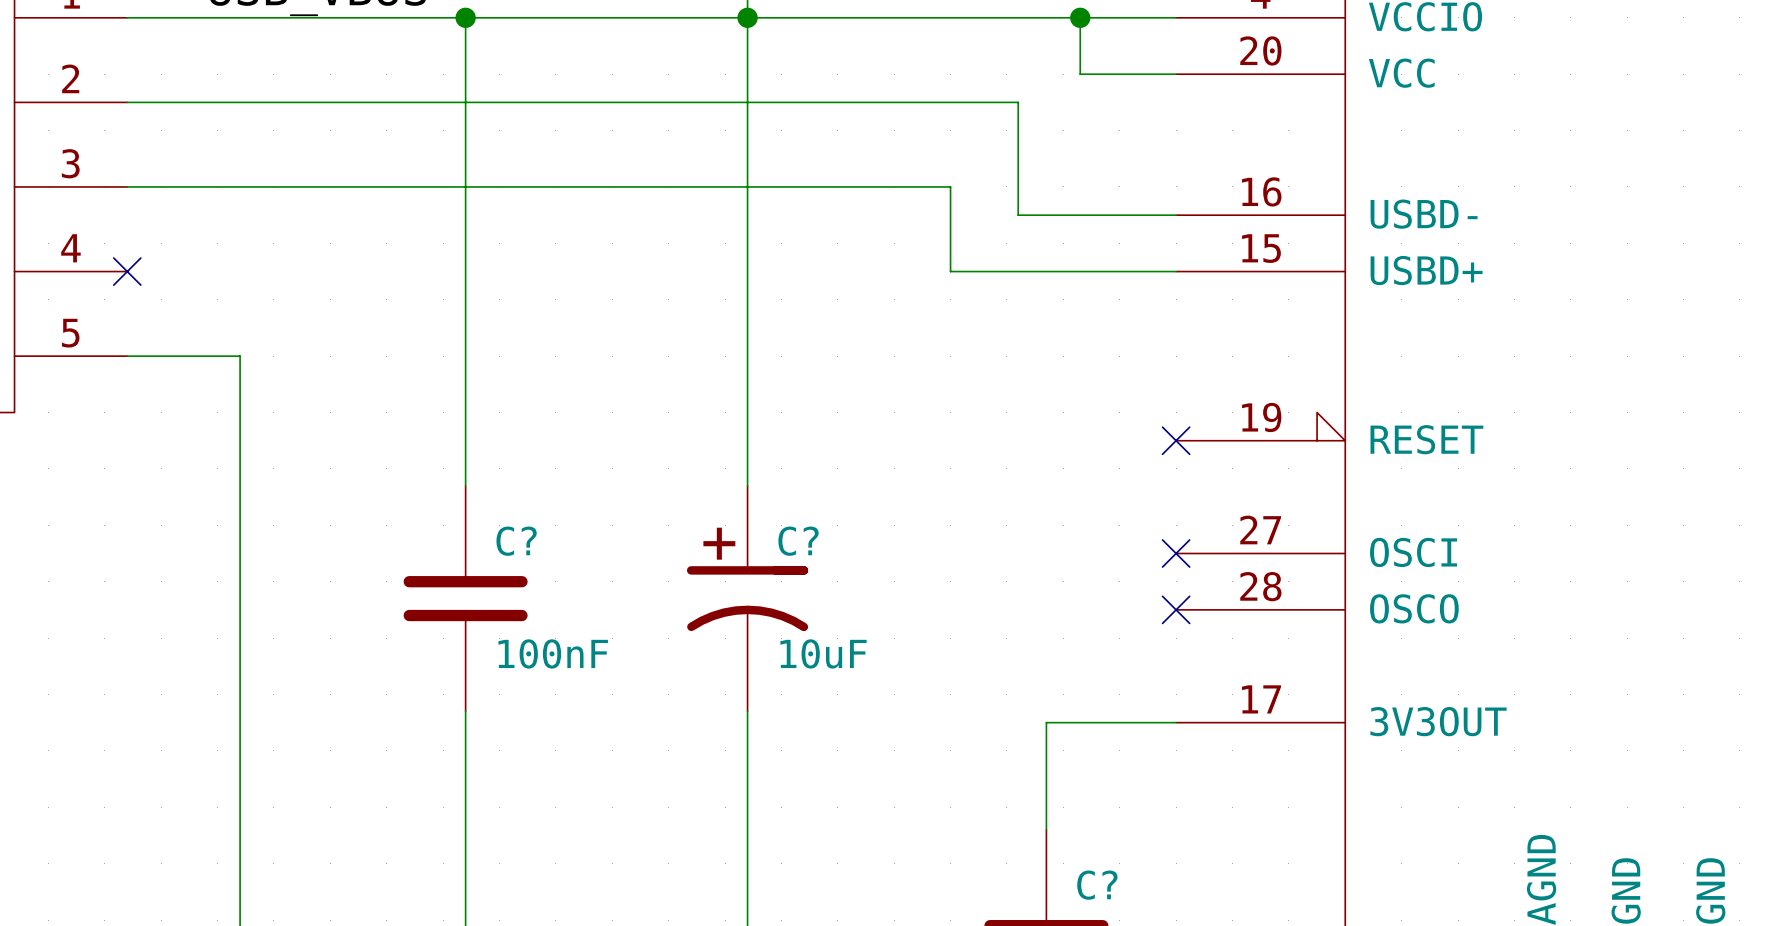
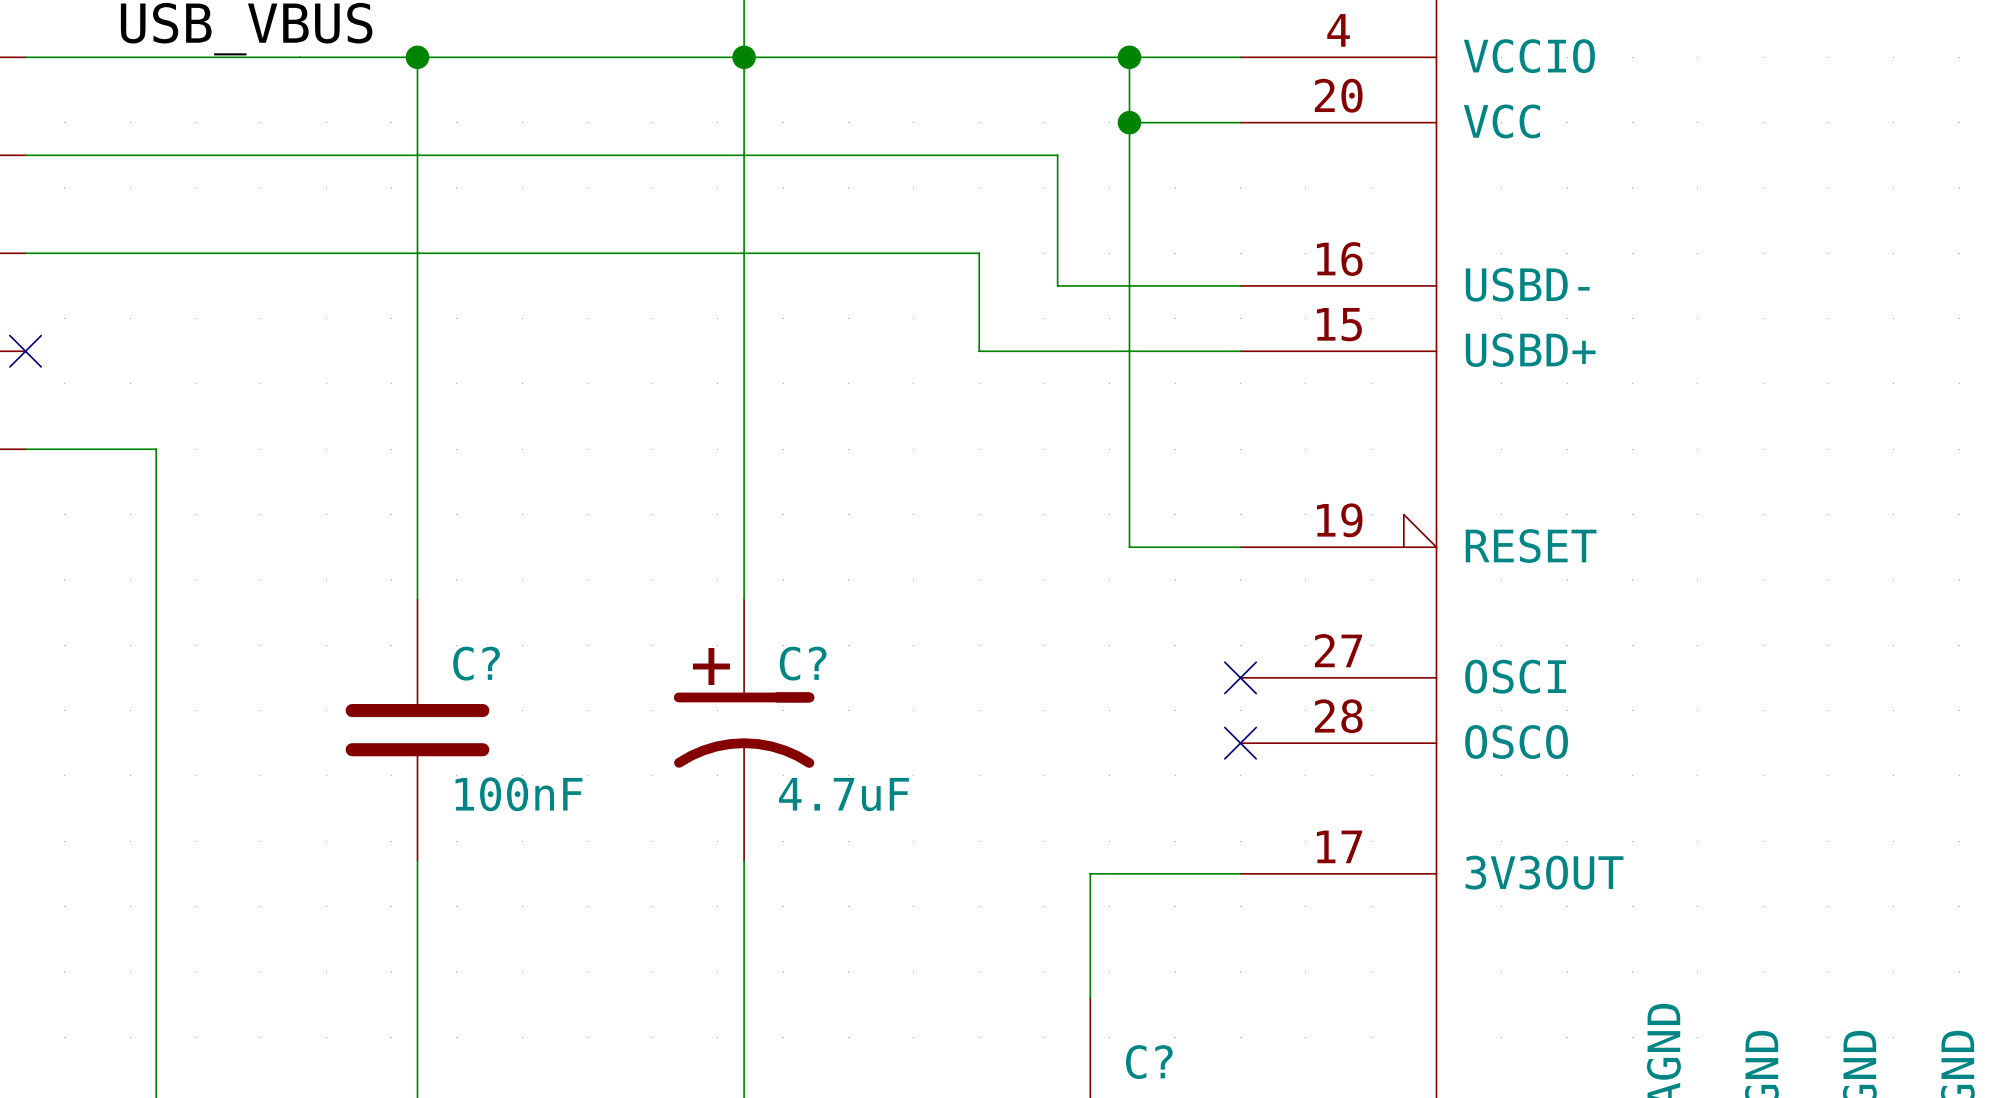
wire: none -> (1129, 122) (1129, 547) (1240, 547)
junction: none -> (1129, 122)
no-connect mark: (1176, 440) -> none
C? value: 10uF (823, 653) -> 4.7uF (843, 794)

